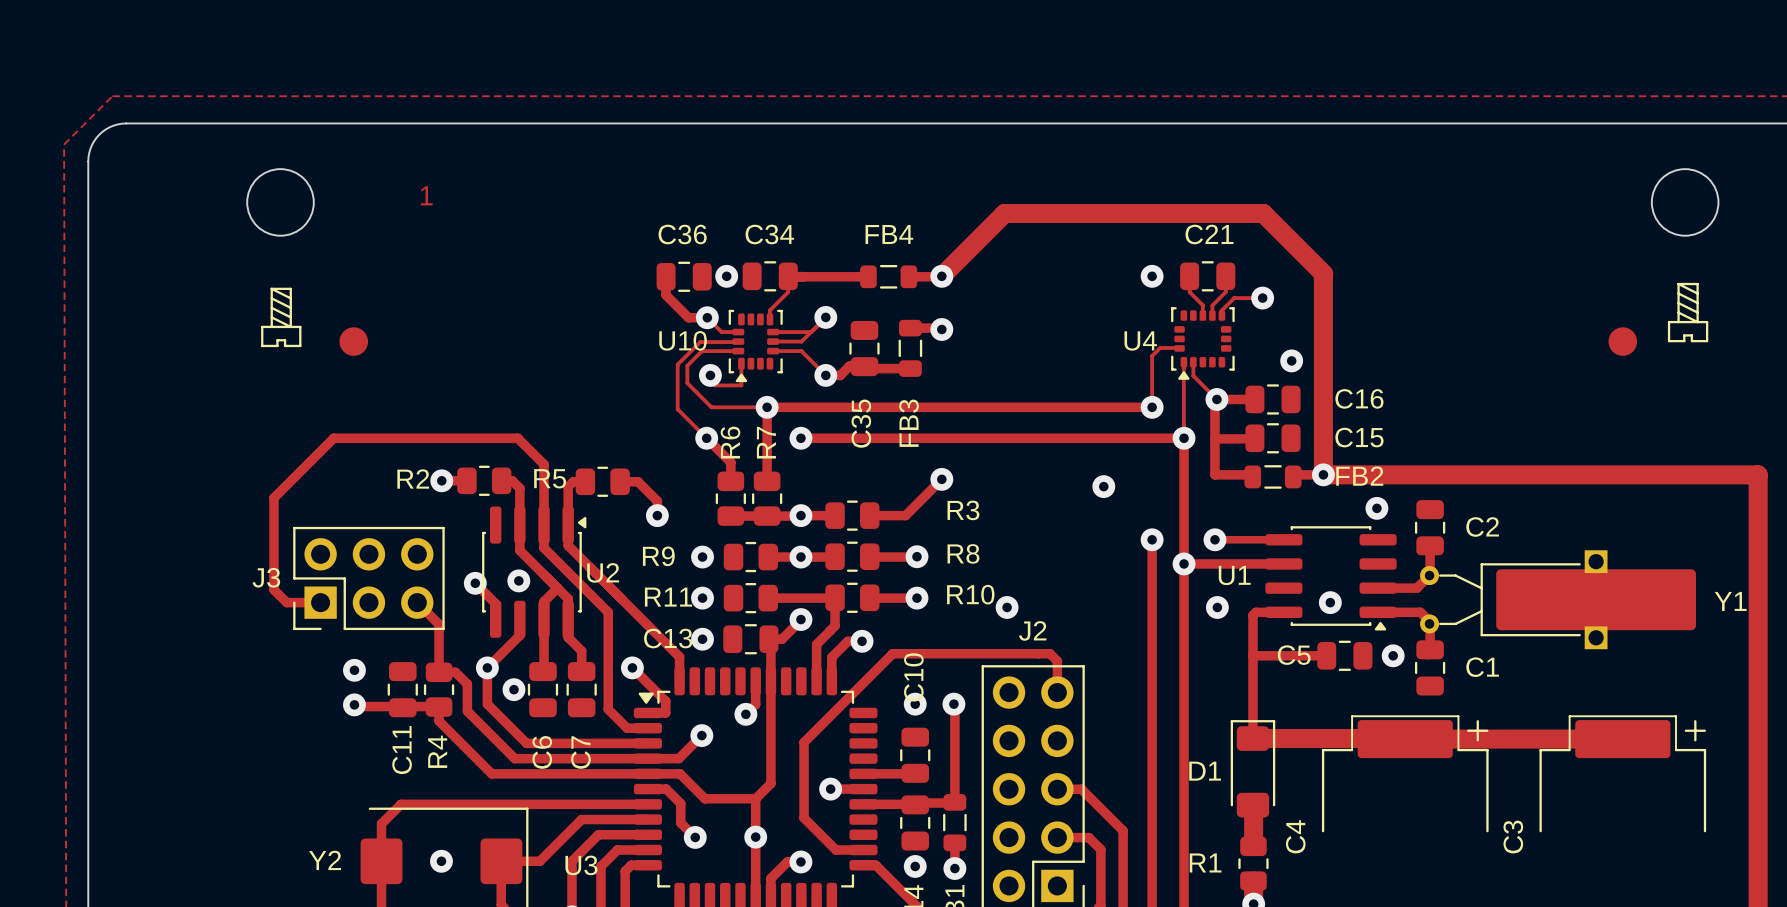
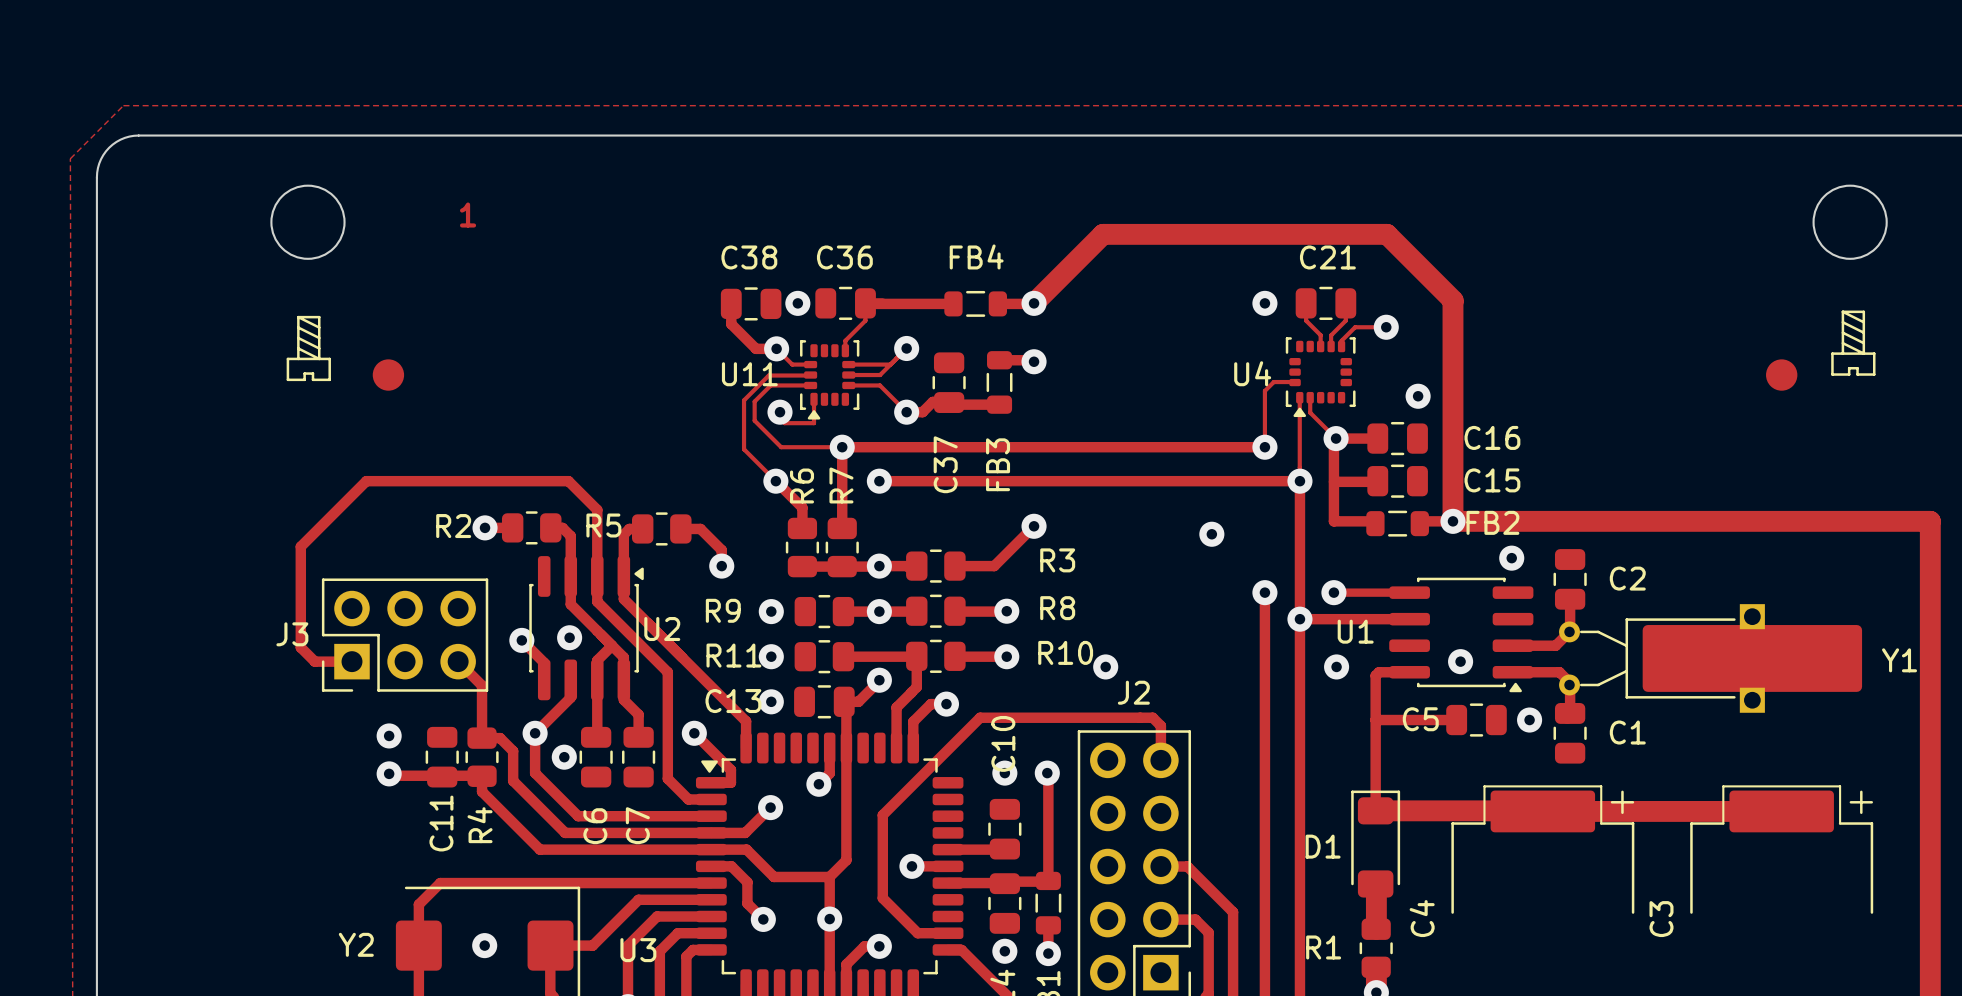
C36 name: C36 (682, 234) -> C38 (749, 257)
C34 name: C34 (769, 234) -> C36 (844, 257)
U10 name: U10 (683, 340) -> U11 (749, 374)
C35 name: C35 (861, 423) -> C37 (945, 464)

